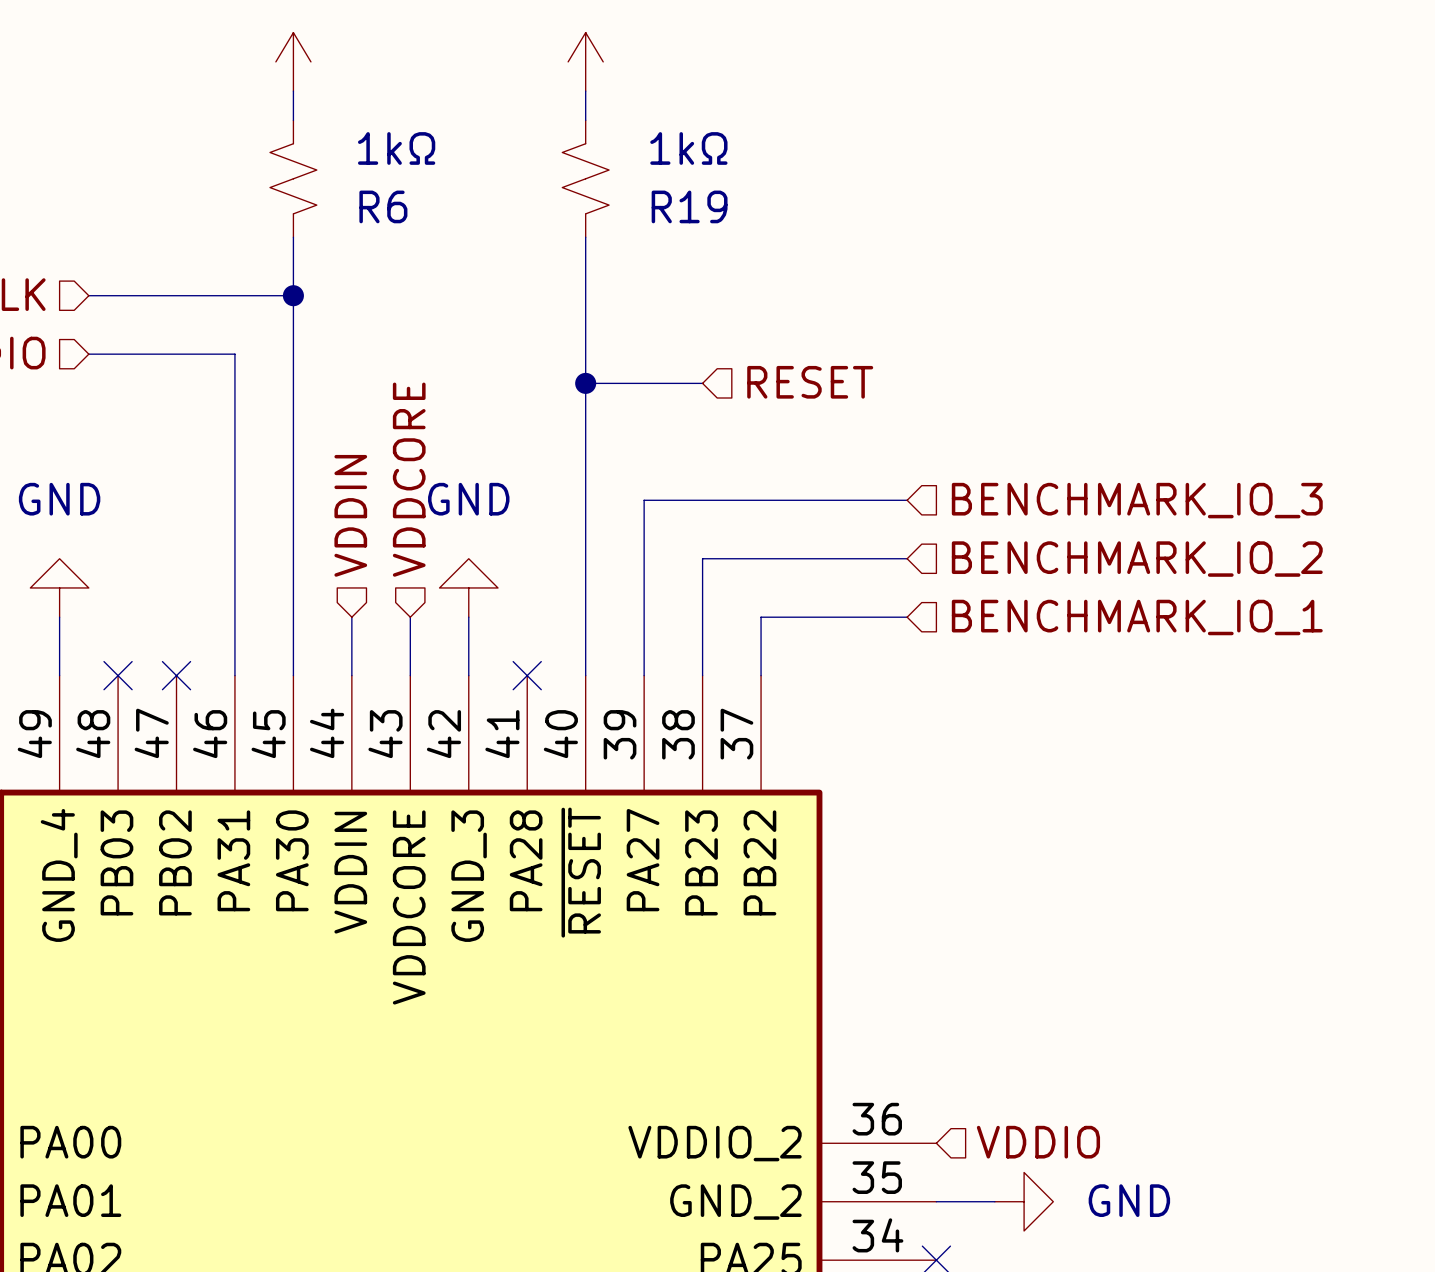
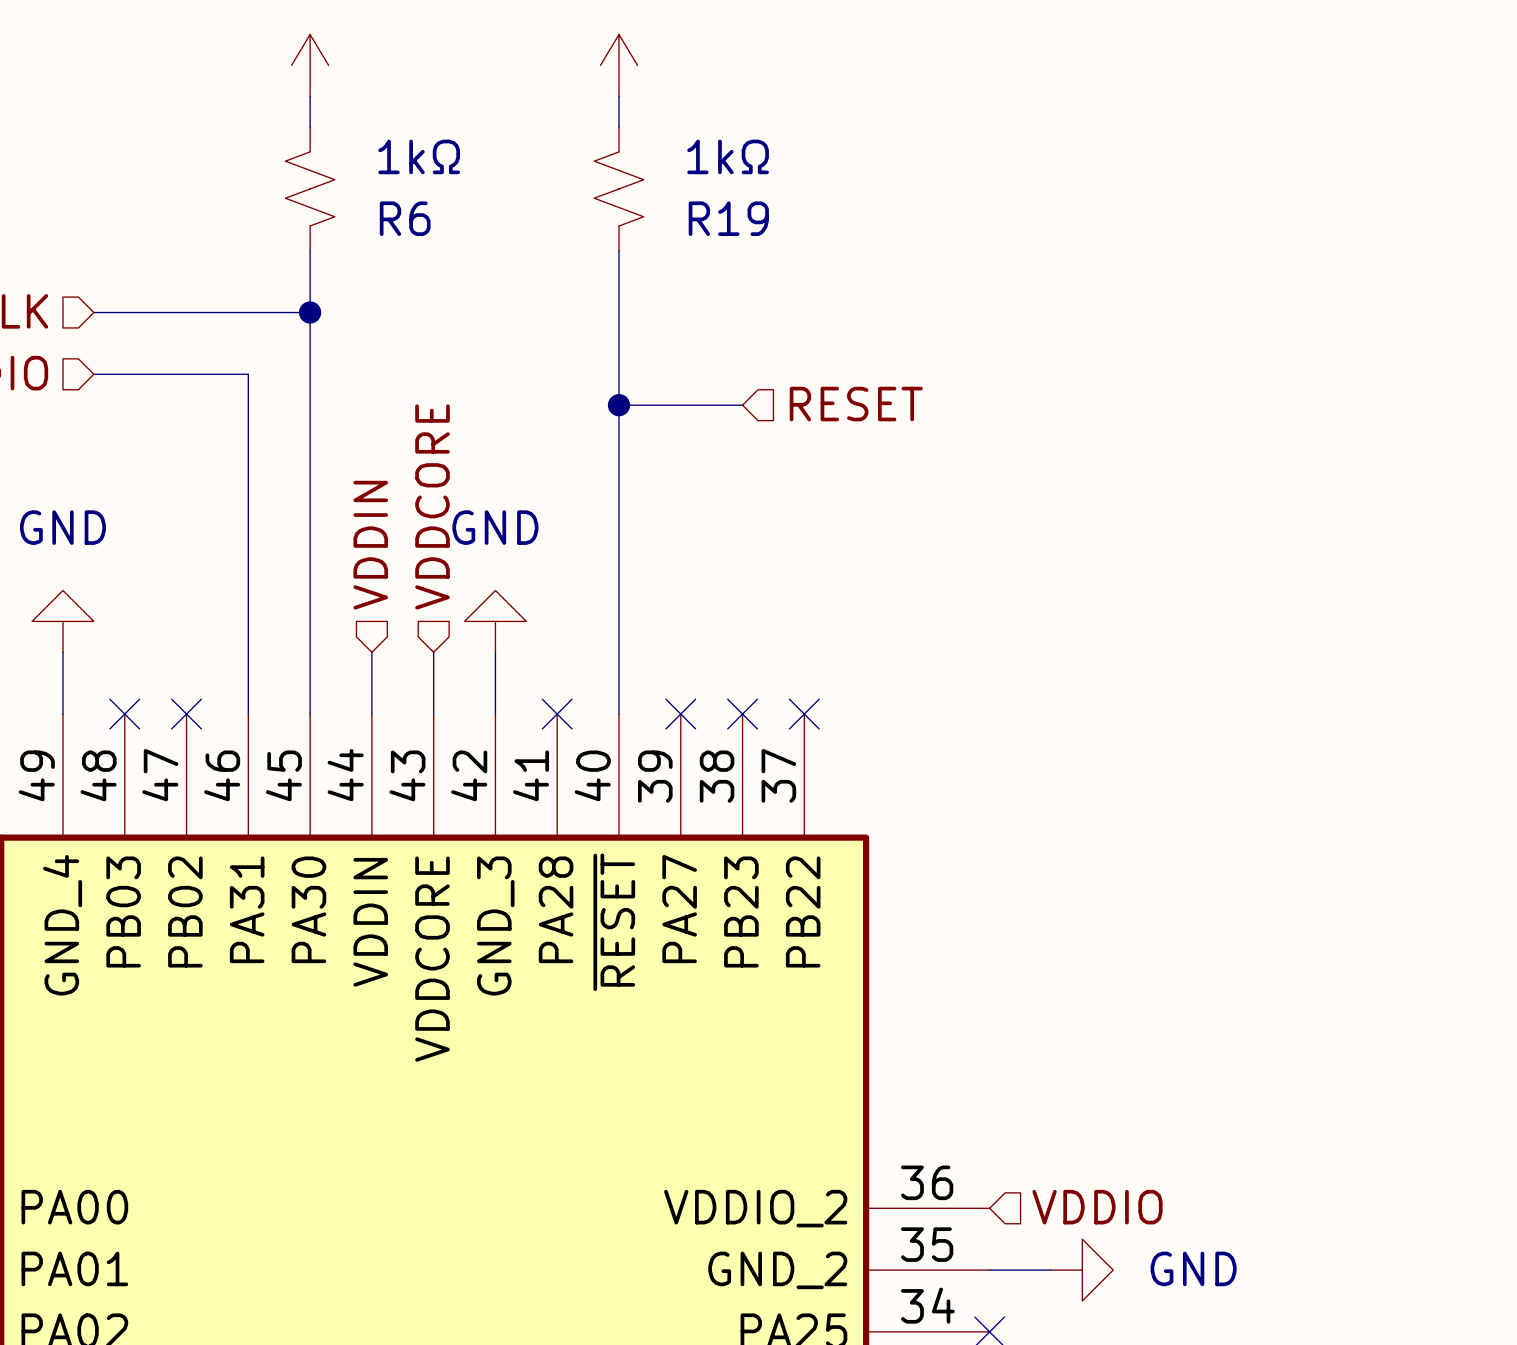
wire: (907, 500) (644, 500) (644, 675) -> none
hierarchical label: BENCHMARK_IO_3 (1137, 500) -> none
wire: (907, 558) (702, 558) (702, 675) -> none
hierarchical label: BENCHMARK_IO_2 (1137, 559) -> none
wire: (907, 617) (761, 617) (761, 675) -> none
hierarchical label: BENCHMARK_IO_1 (1137, 617) -> none
no-connect mark: none -> (680, 714)
no-connect mark: none -> (742, 714)
no-connect mark: none -> (804, 714)

